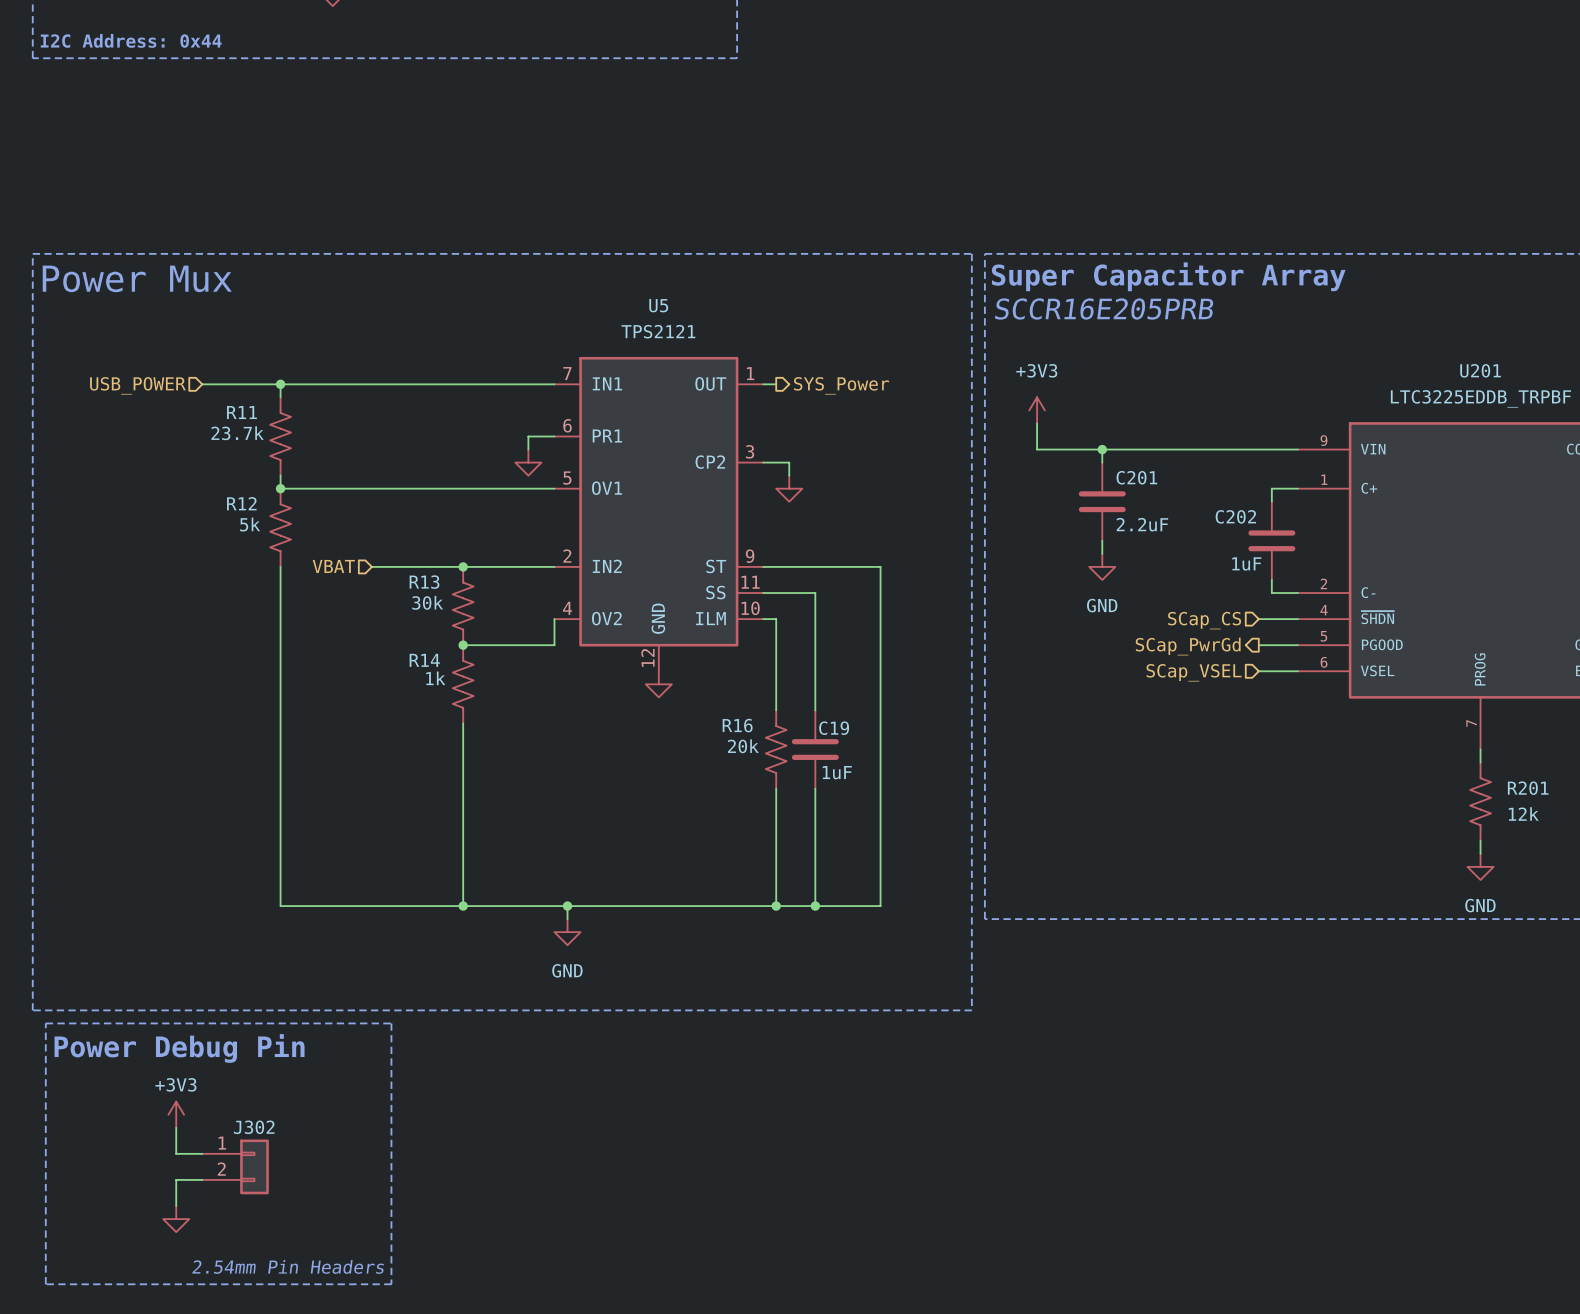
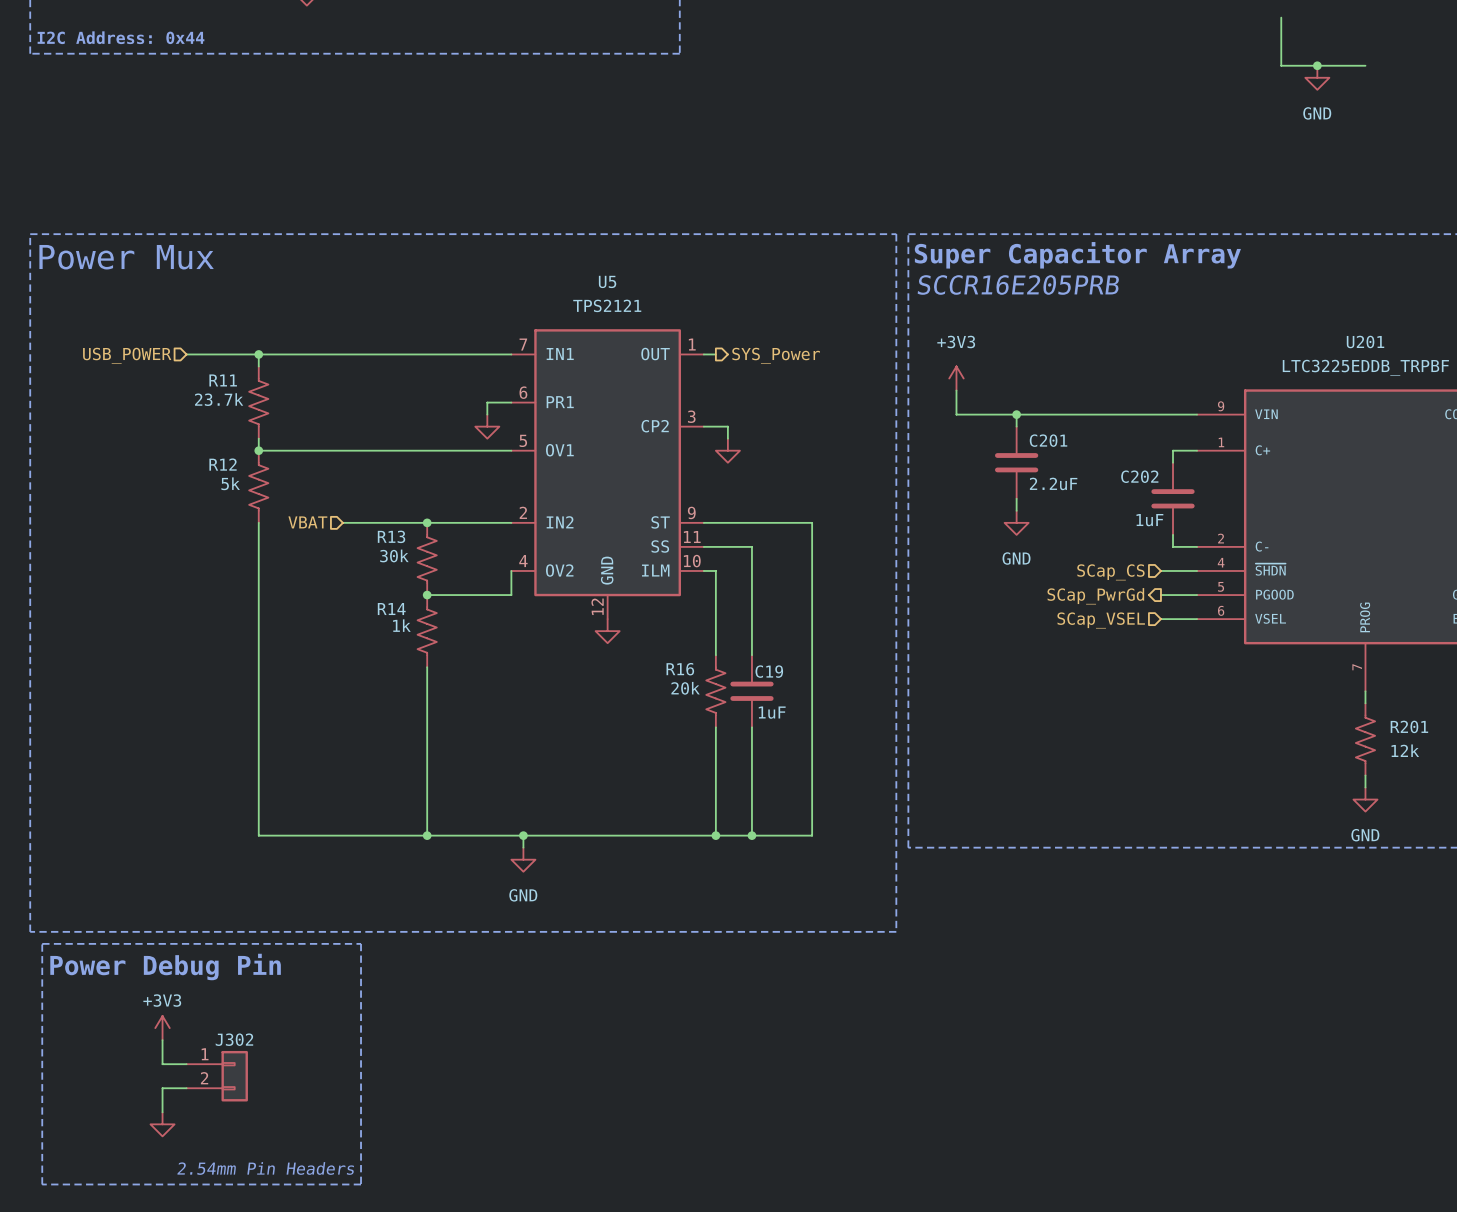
wire: none -> (1281, 17) (1281, 65) (1365, 65)
junction: none -> (1317, 65)
power symbol: none -> GND (1317, 77)

